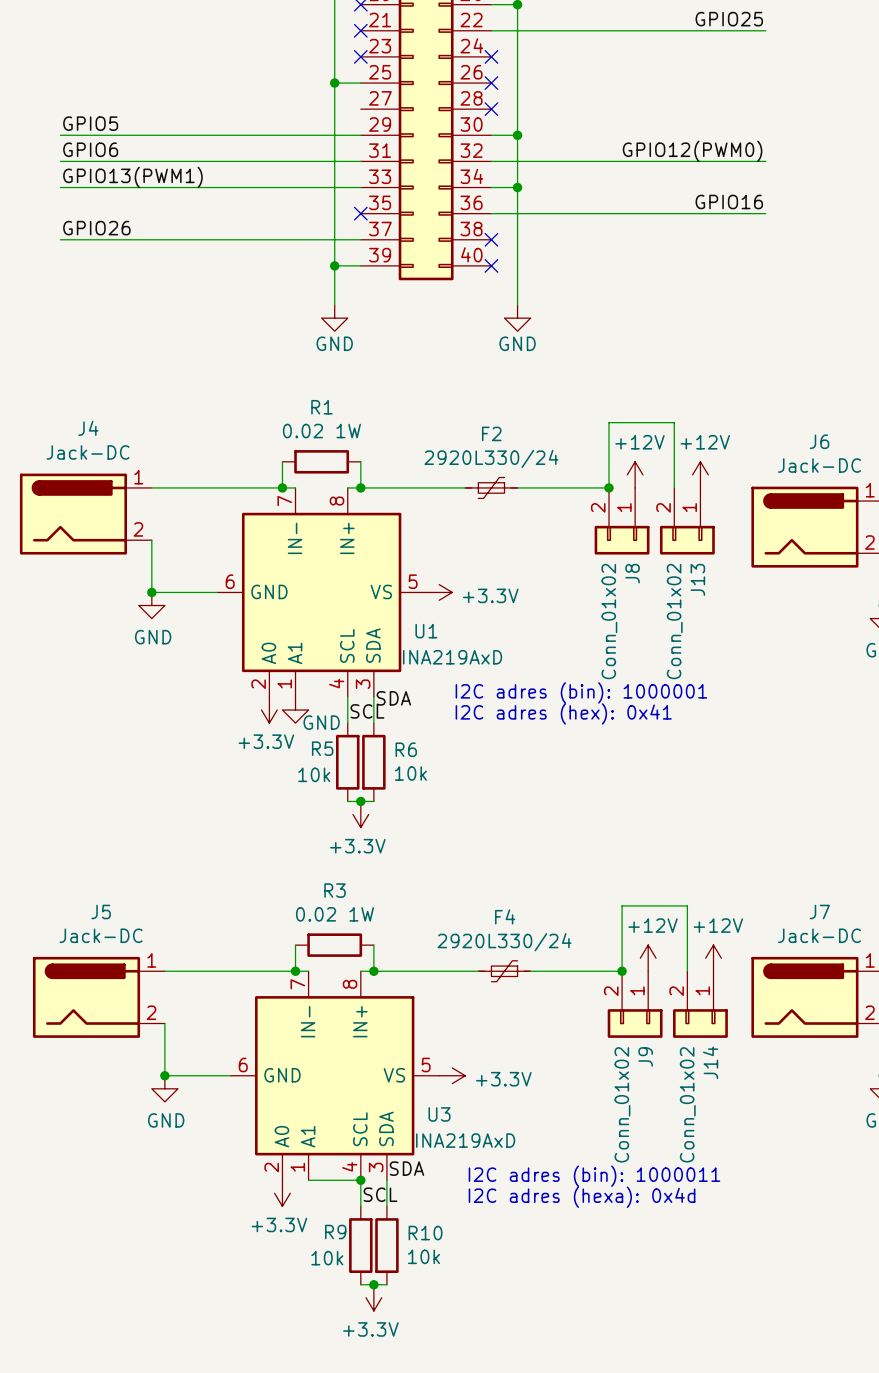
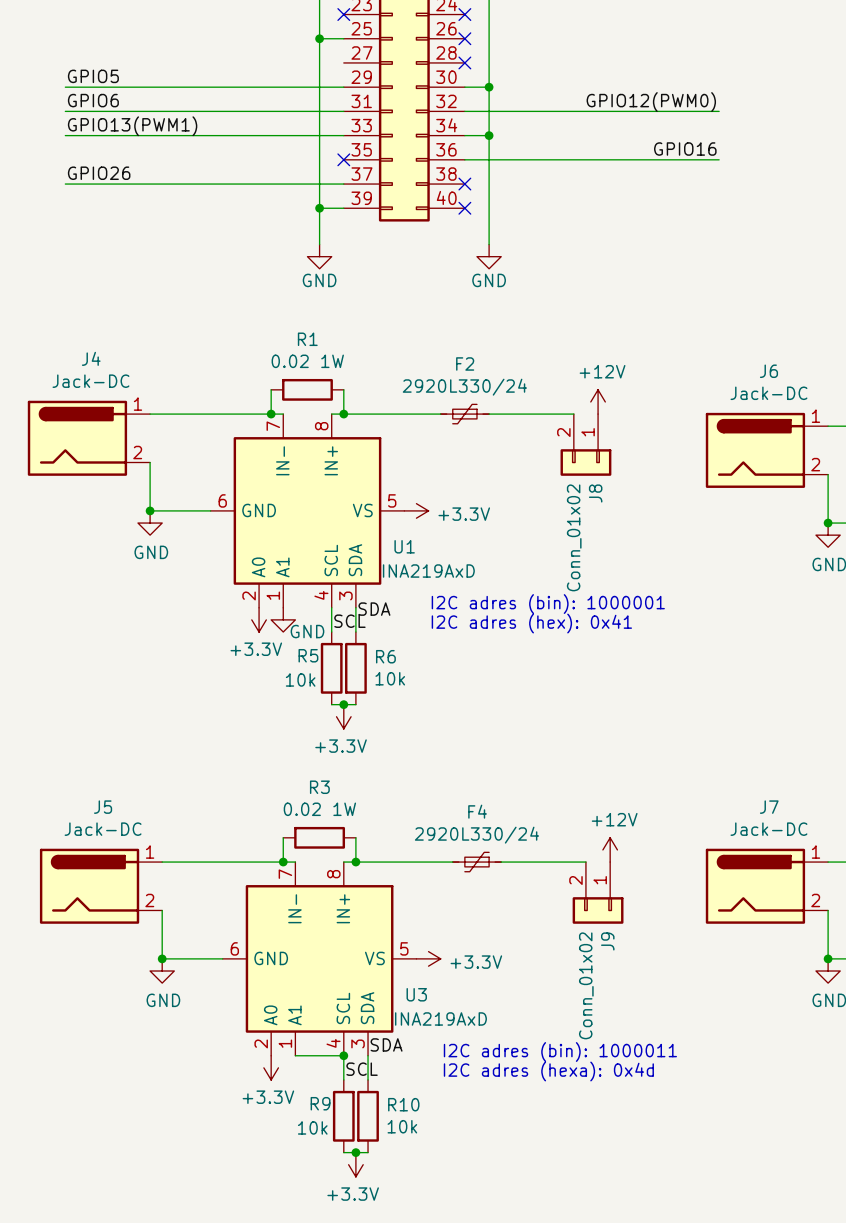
power symbol: +12V (700, 474) -> none
wire: (609, 487) (609, 422) (674, 422) (674, 487) -> none
junction: (609, 487) -> none
J13: Conn_01x02 (687, 521) -> none
power symbol: +12V (713, 958) -> none
wire: (622, 971) (622, 905) (687, 905) (687, 971) -> none
junction: (622, 971) -> none
J14: Conn_01x02 (700, 1004) -> none

